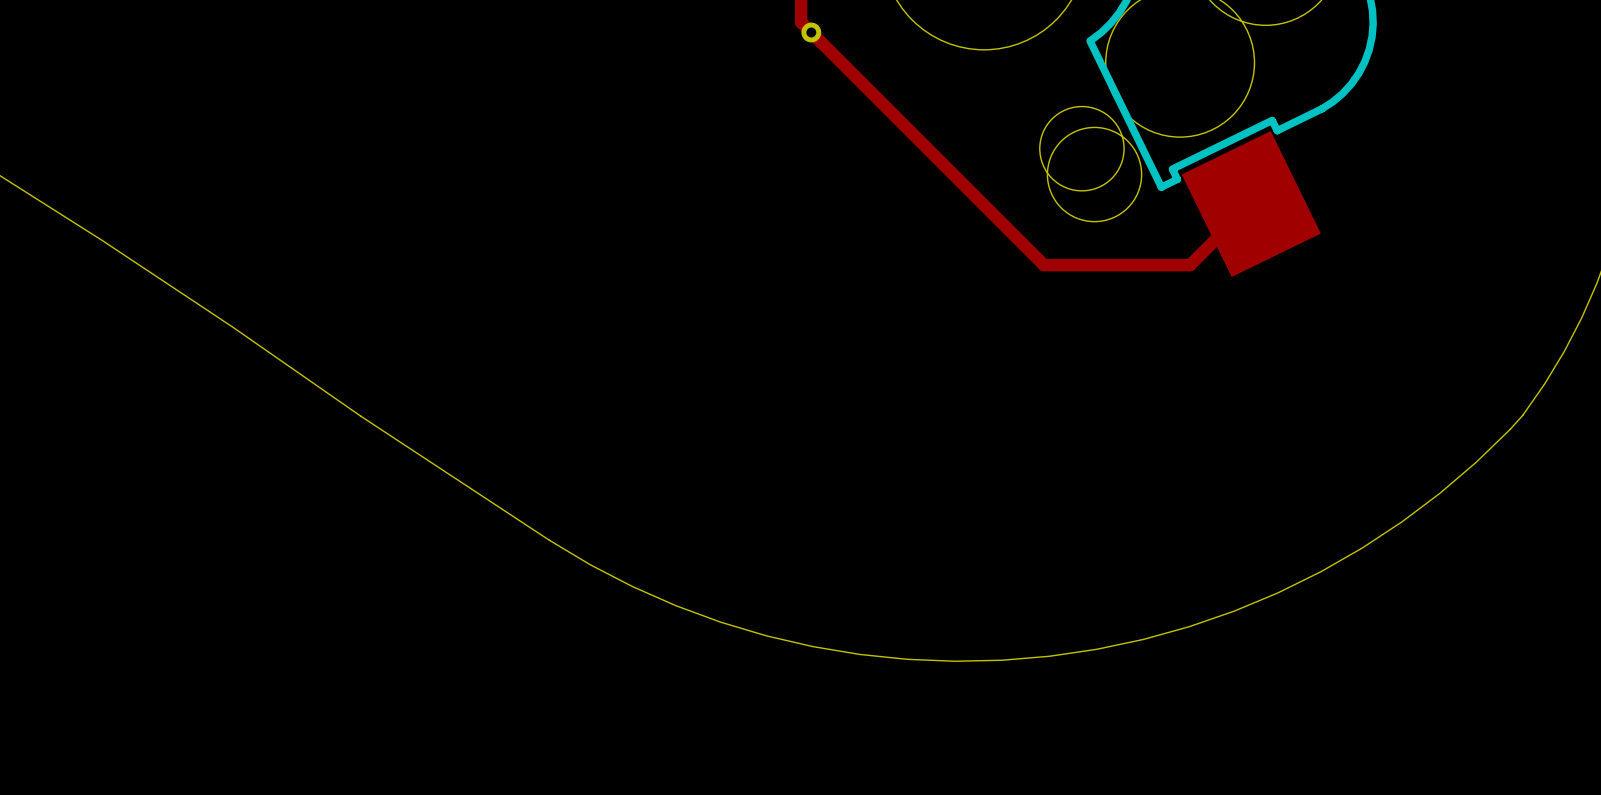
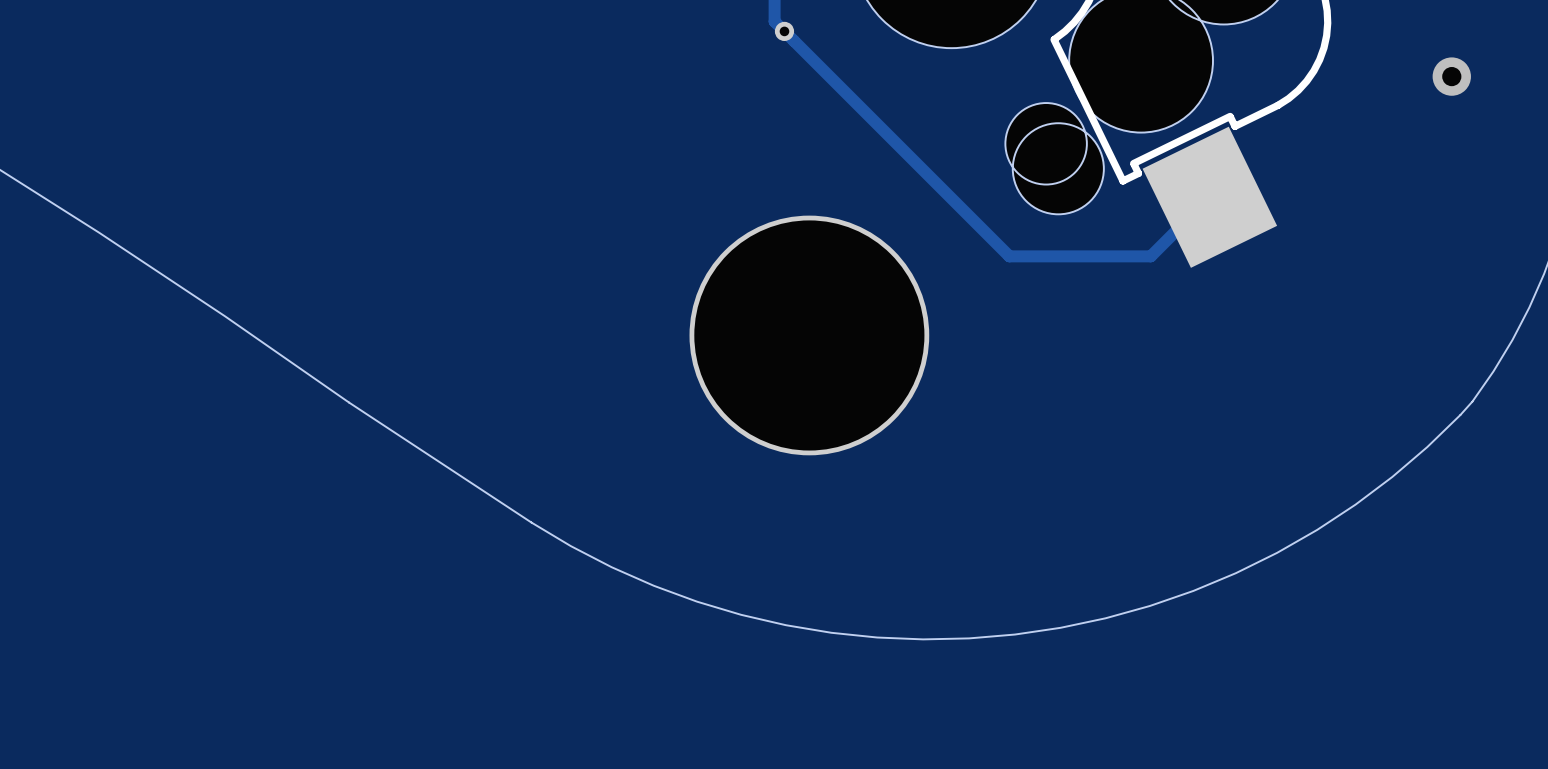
via: none -> (1451, 76)
part: none -> (809, 335)

